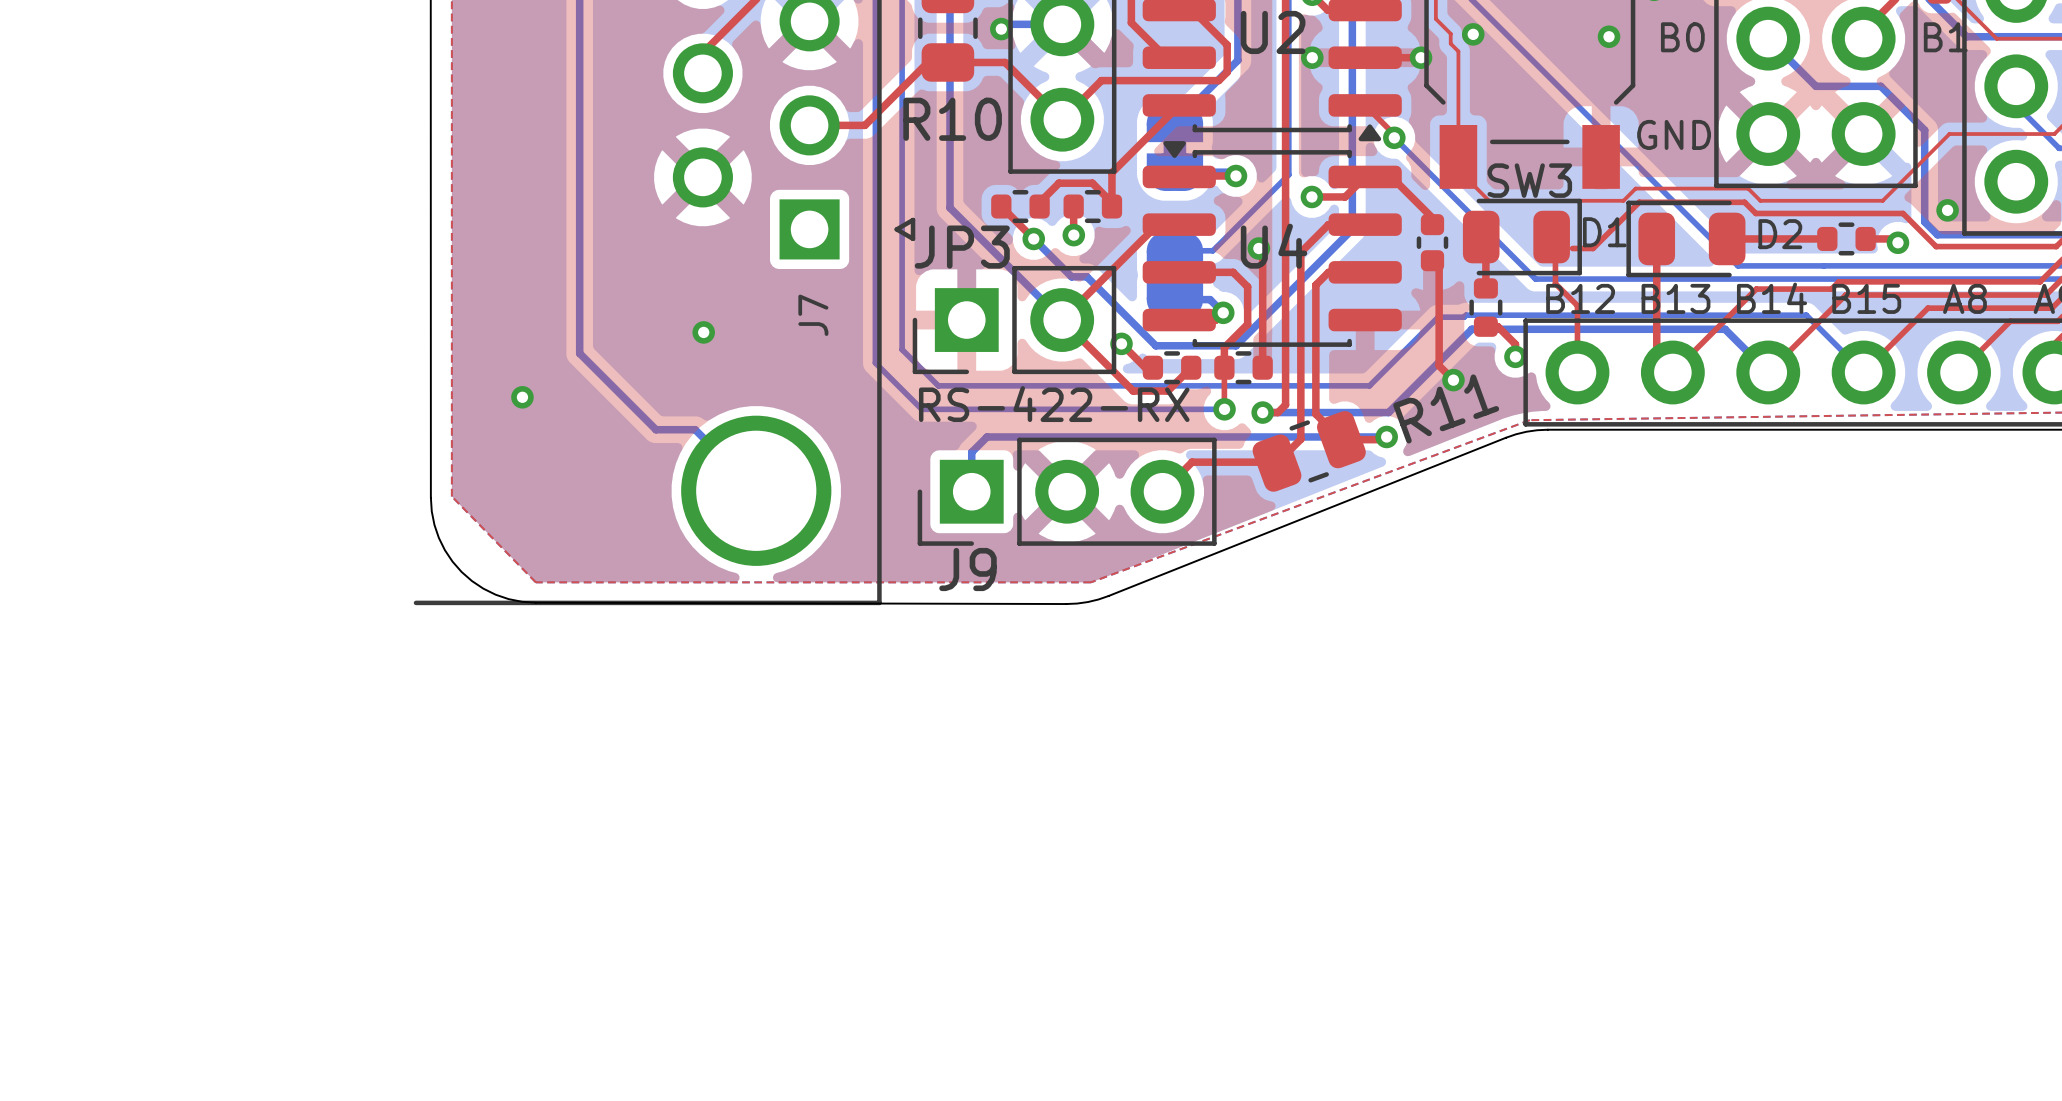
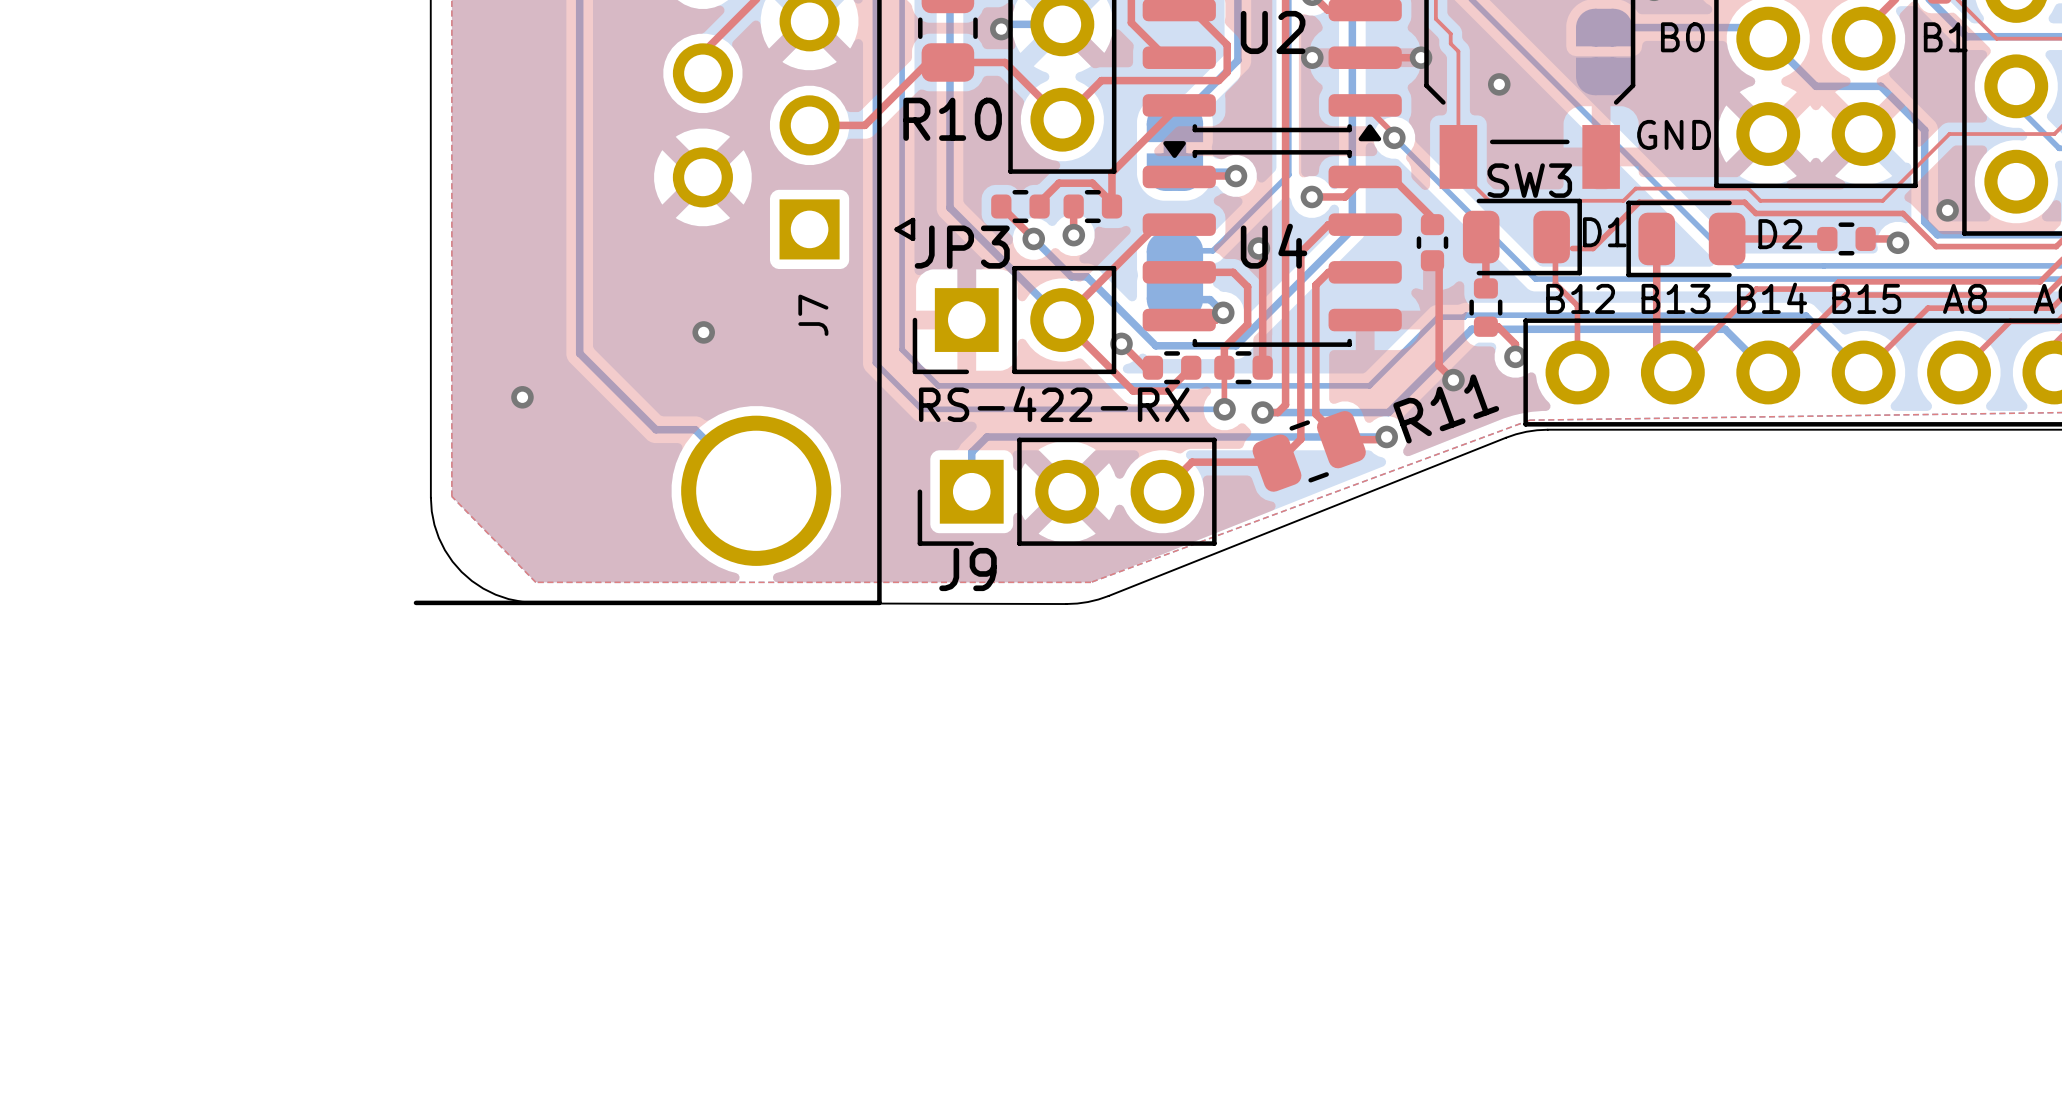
bottom track: none -> (1604, 27) (1757, 27)
via position: (1473, 34) -> (1499, 84)
via: (1609, 36) -> none
part: none -> (1604, 51)

